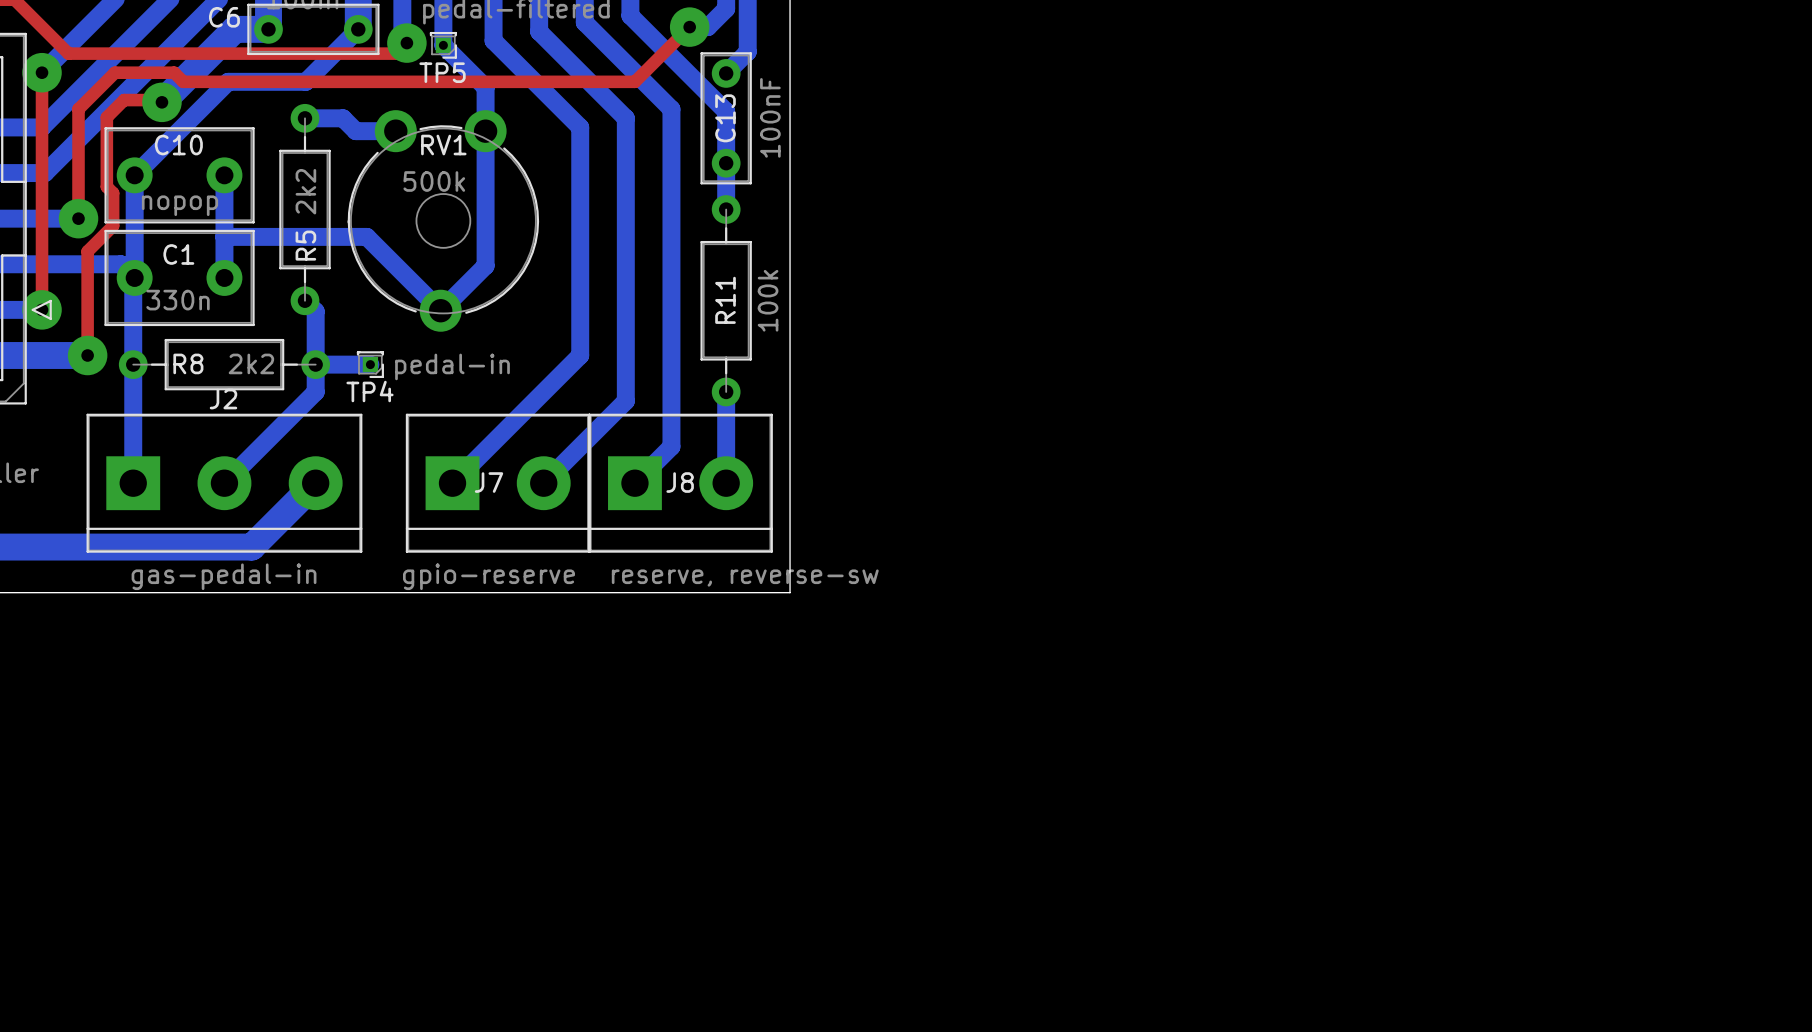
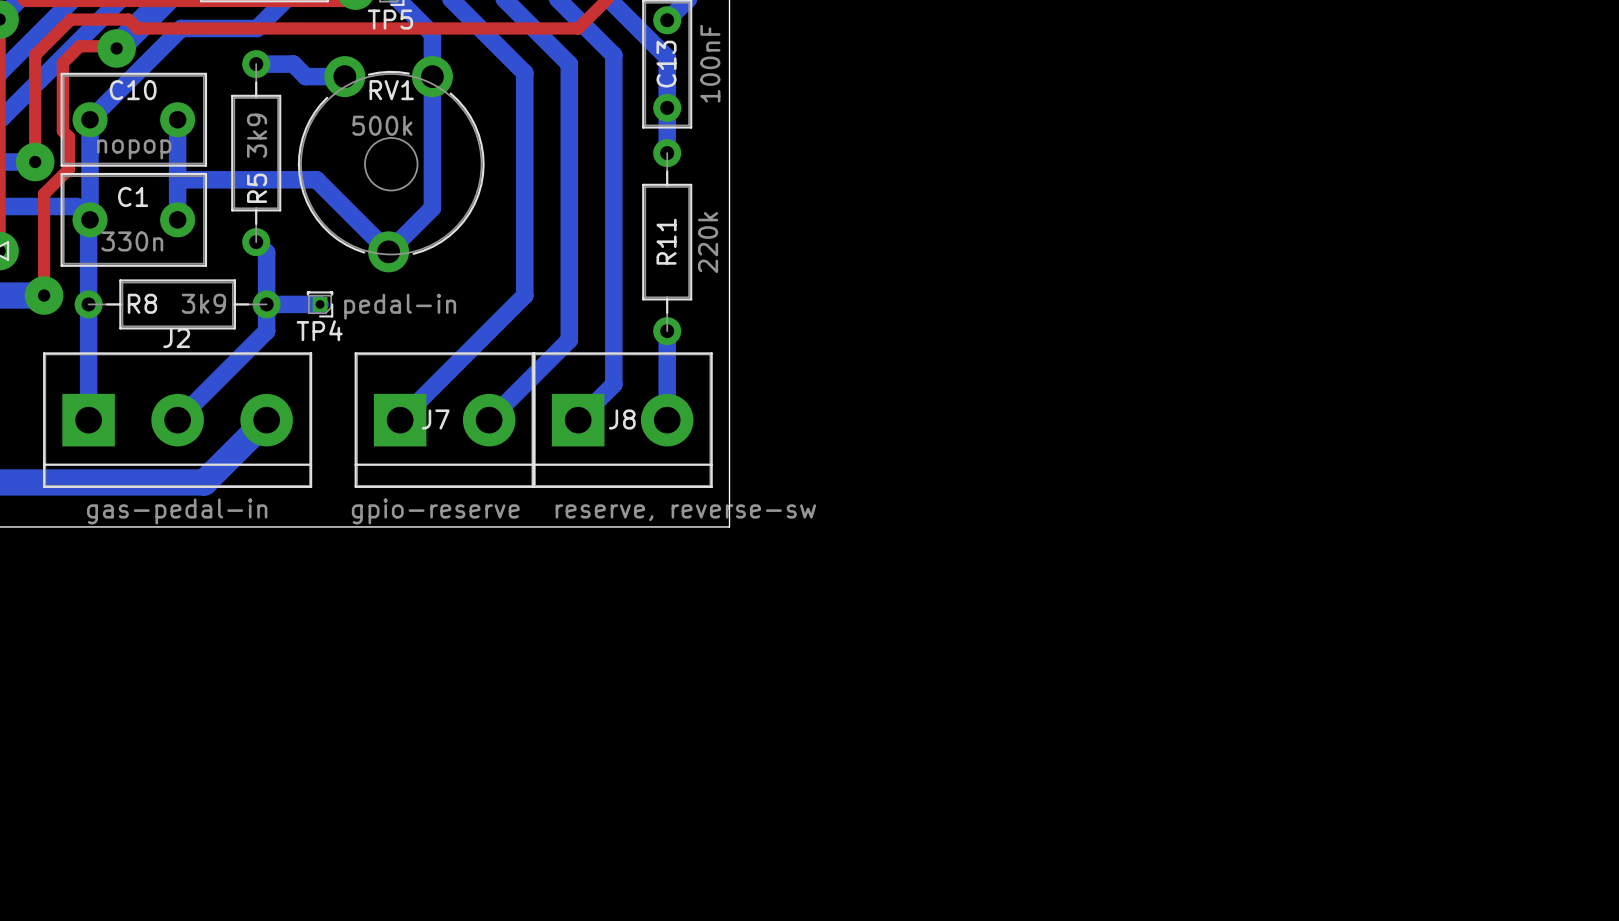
R5 value: 2k2 (305, 191) -> 3k9 (257, 135)
R11 value: 100k (768, 300) -> 220k (708, 242)
R8 value: 2k2 (251, 363) -> 3k9 (203, 303)

